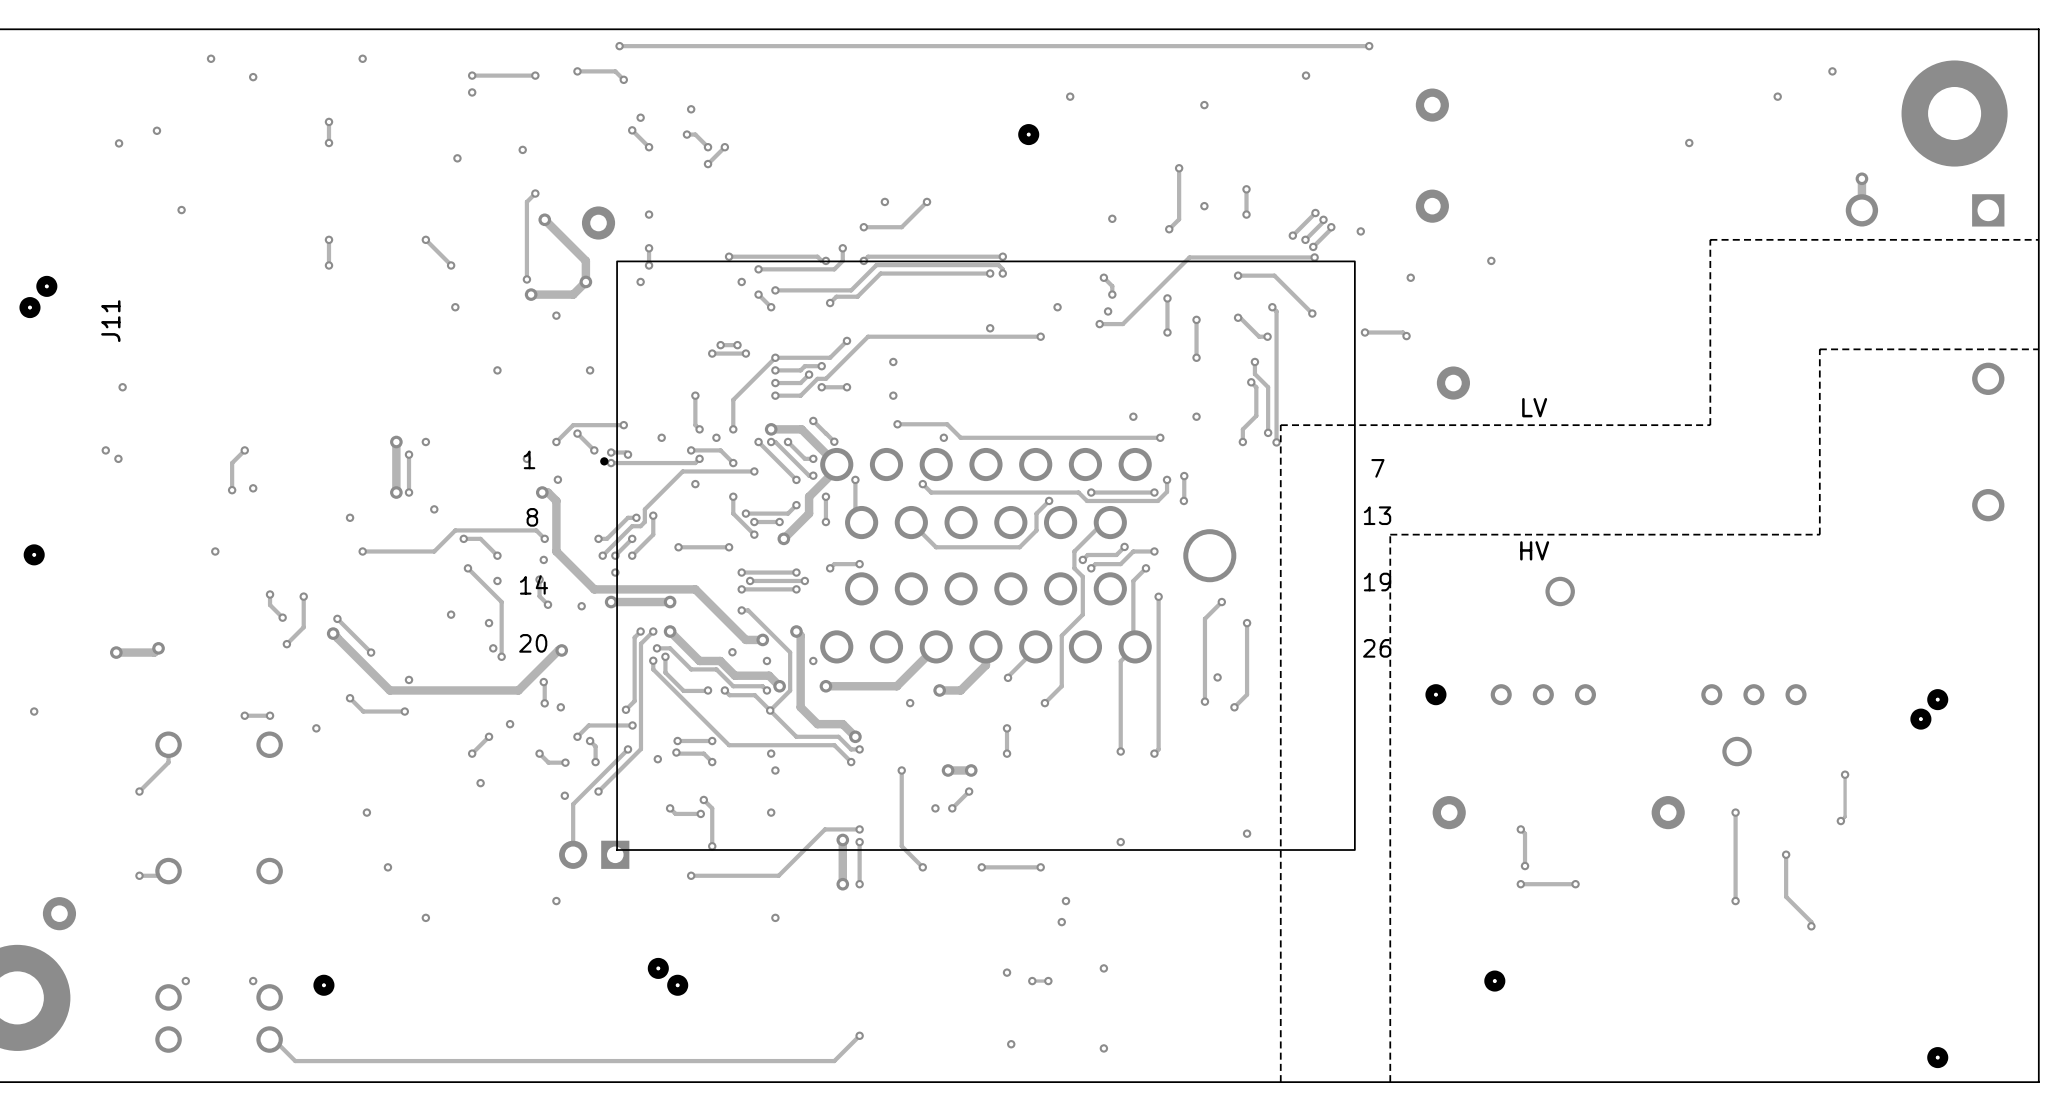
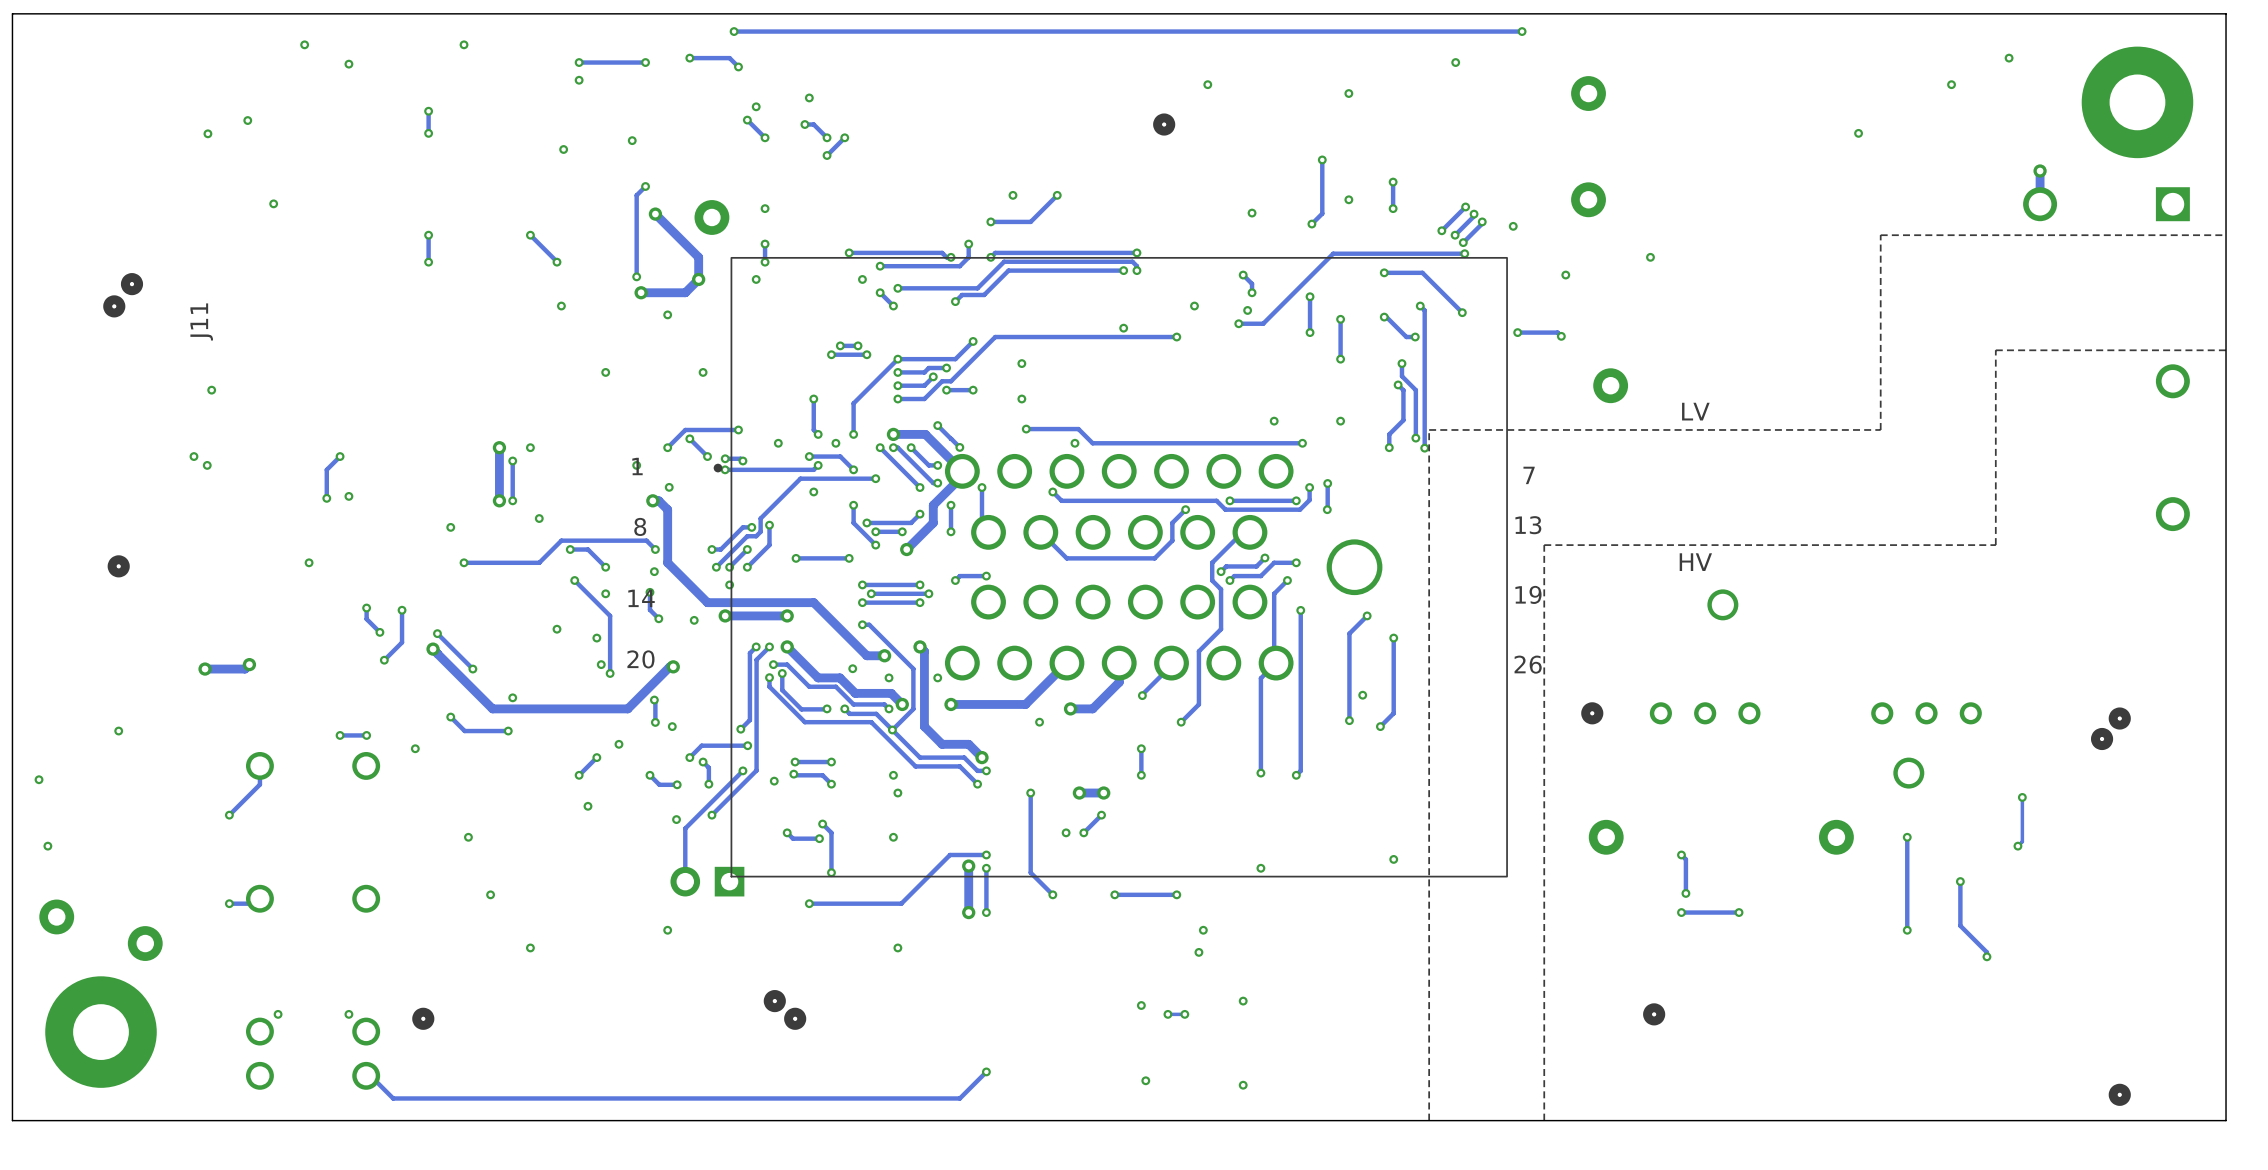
track: (686, 703) (729, 745) (792, 745) -> (804, 722) (871, 722) (915, 766)

